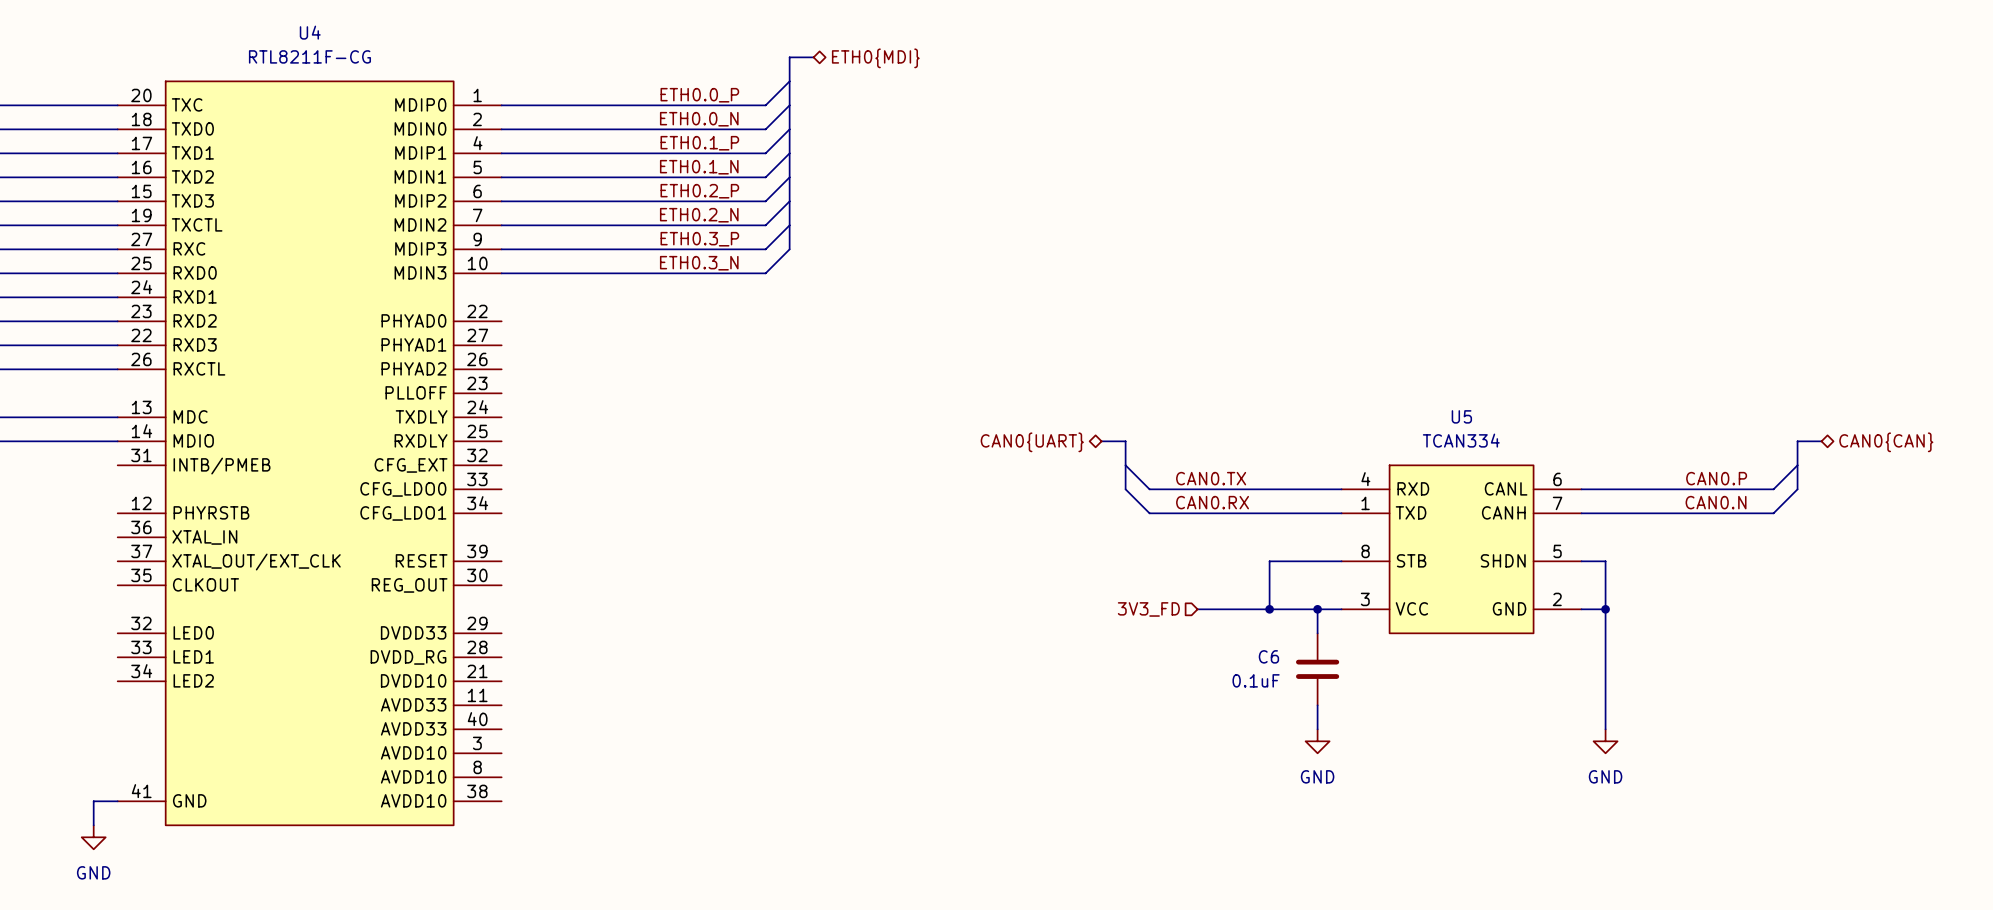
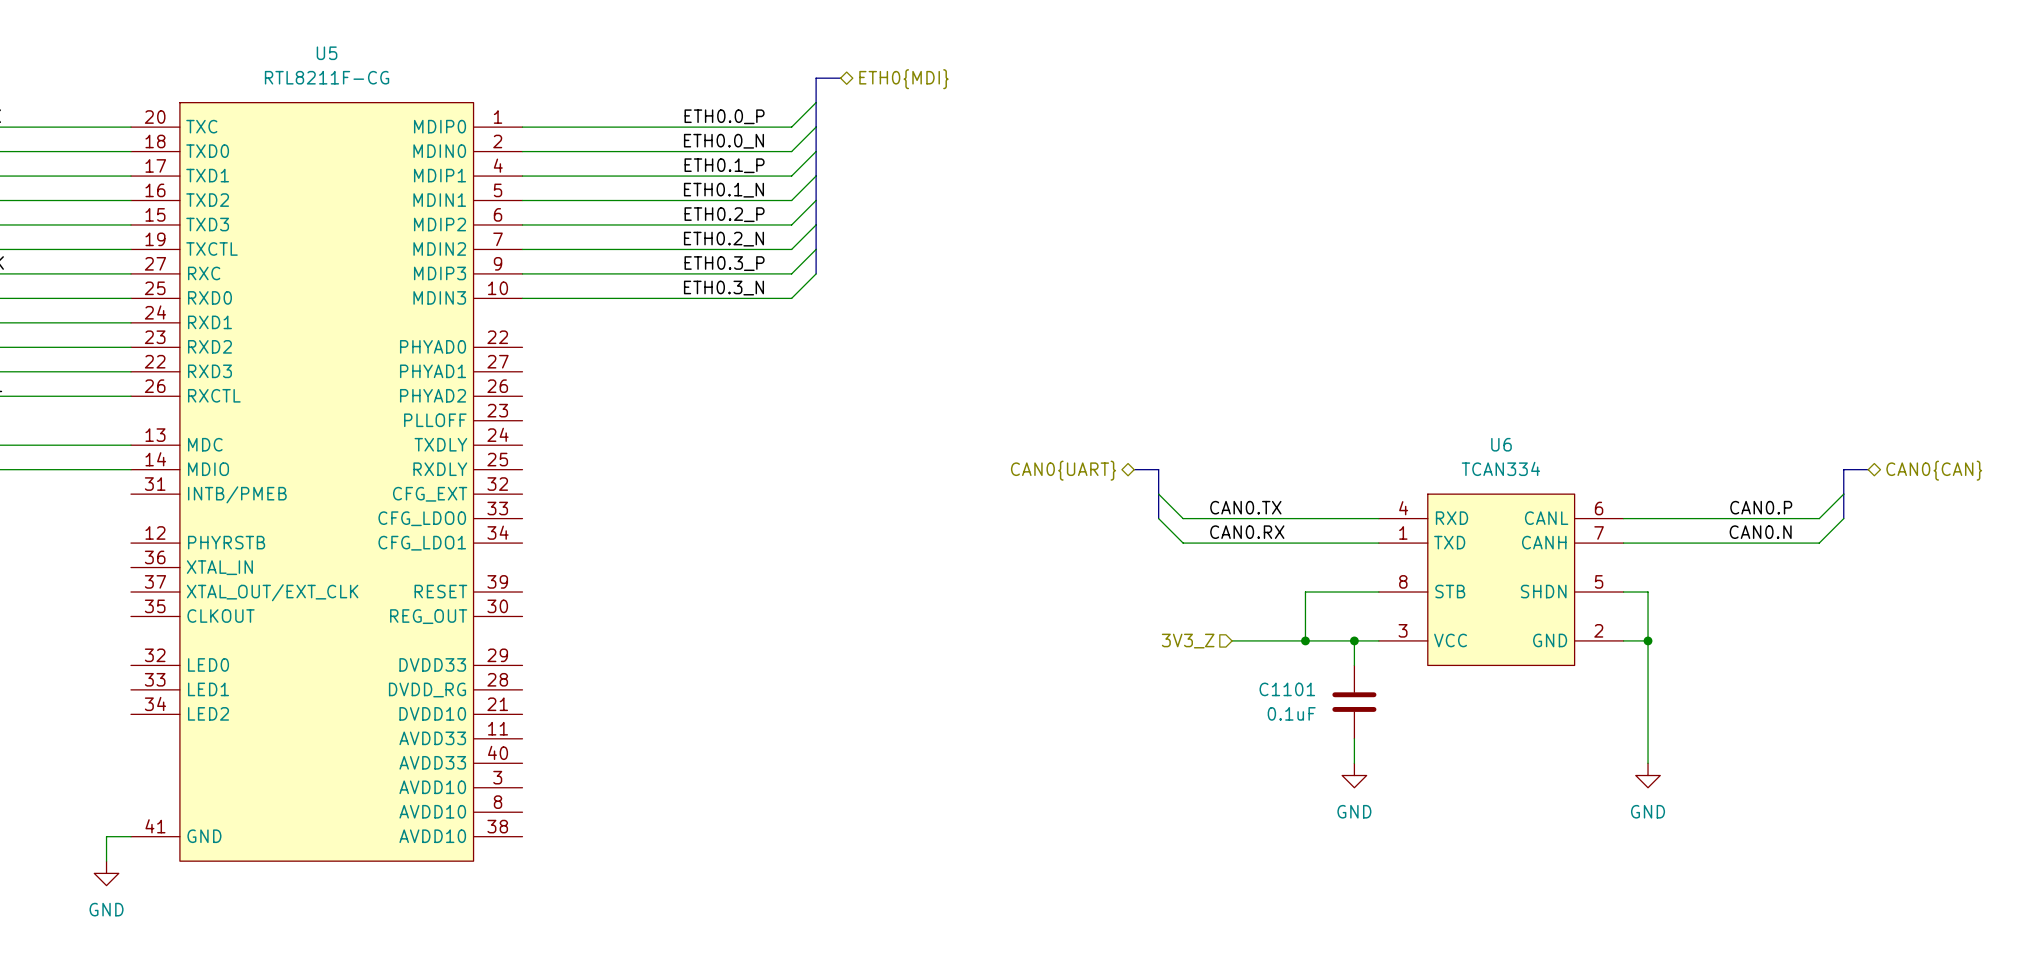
U4 name: U4 (310, 32) -> U5 (327, 53)
U5 name: U5 (1461, 416) -> U6 (1501, 444)
hierarchical label: 3V3_FD (1148, 609) -> 3V3_Z (1188, 641)
C6 name: C6 (1268, 656) -> C1101 (1287, 689)

